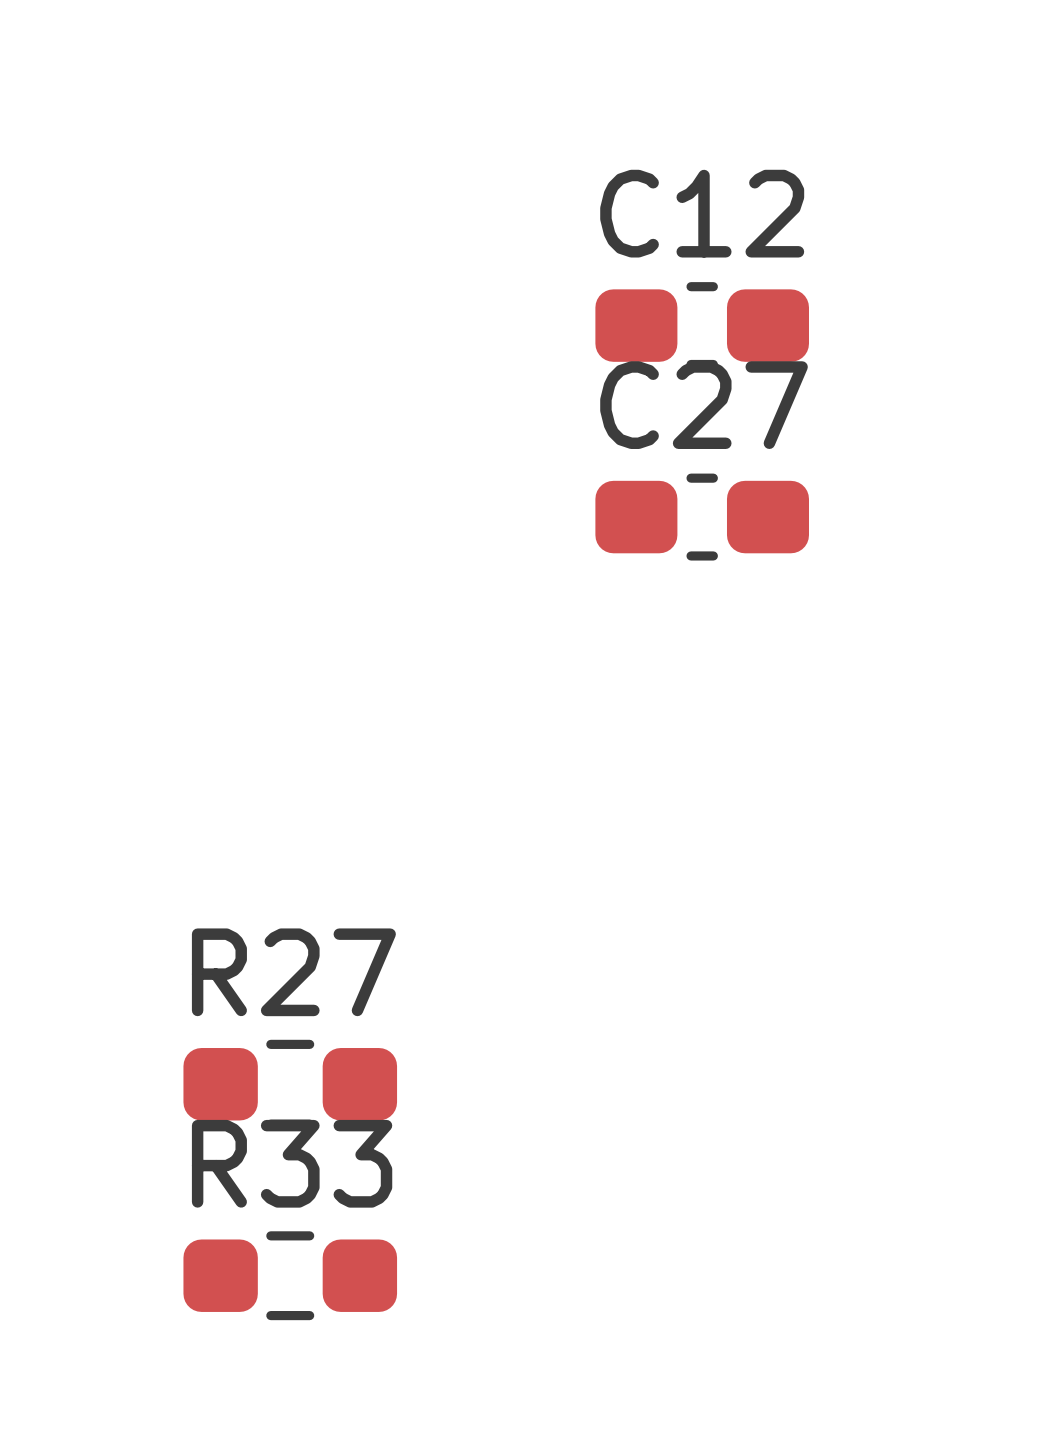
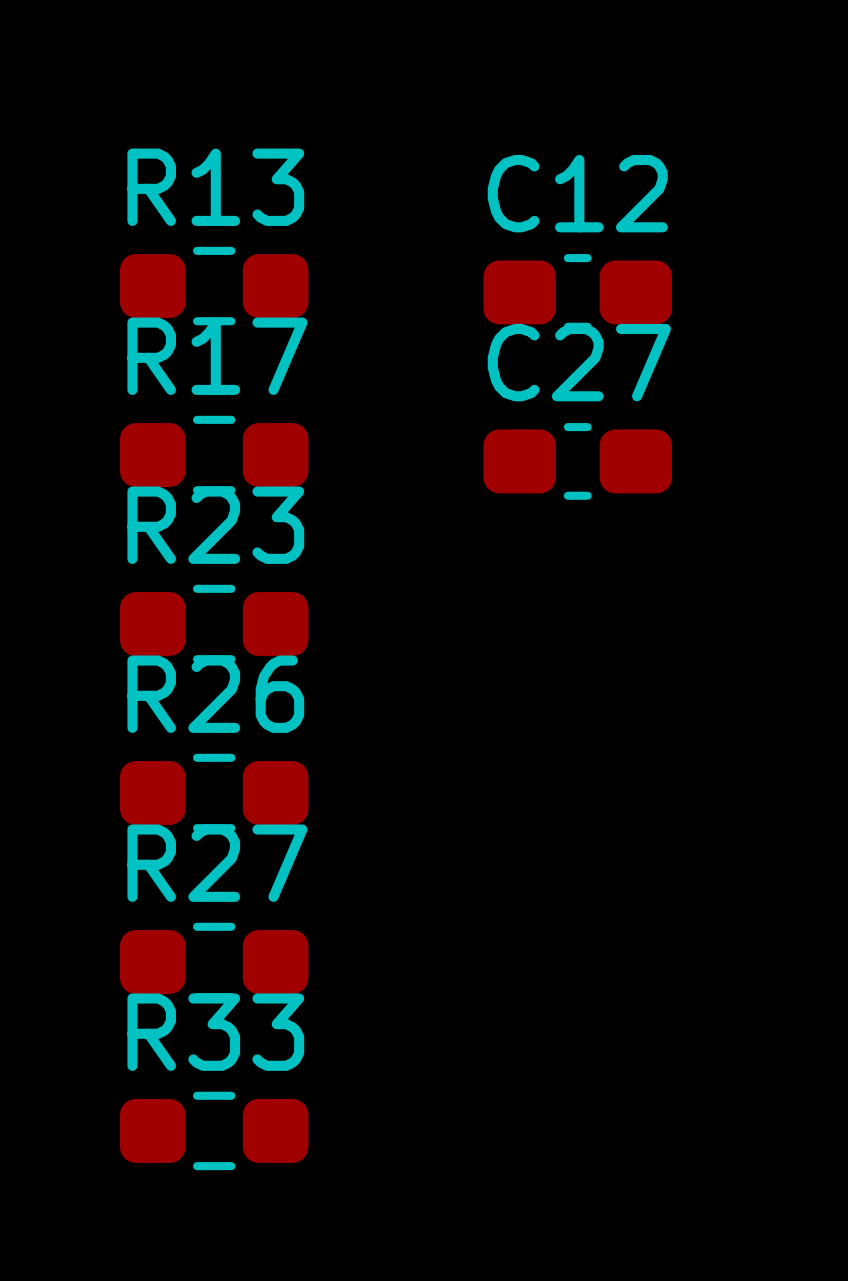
R13: none -> (214, 286)
R17: none -> (214, 455)
R23: none -> (214, 624)
R26: none -> (214, 792)

